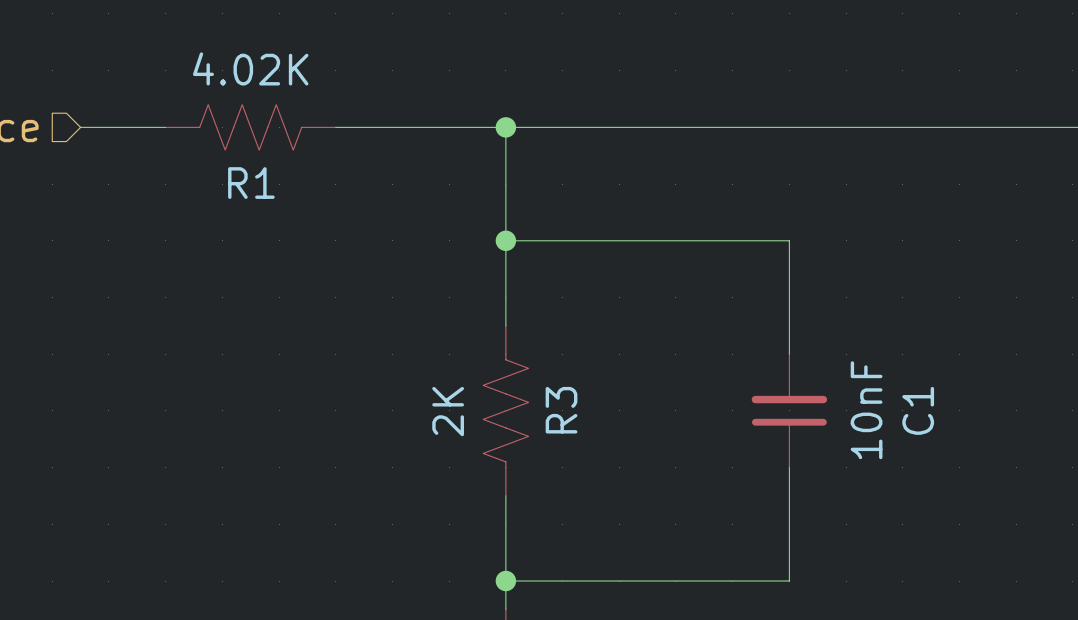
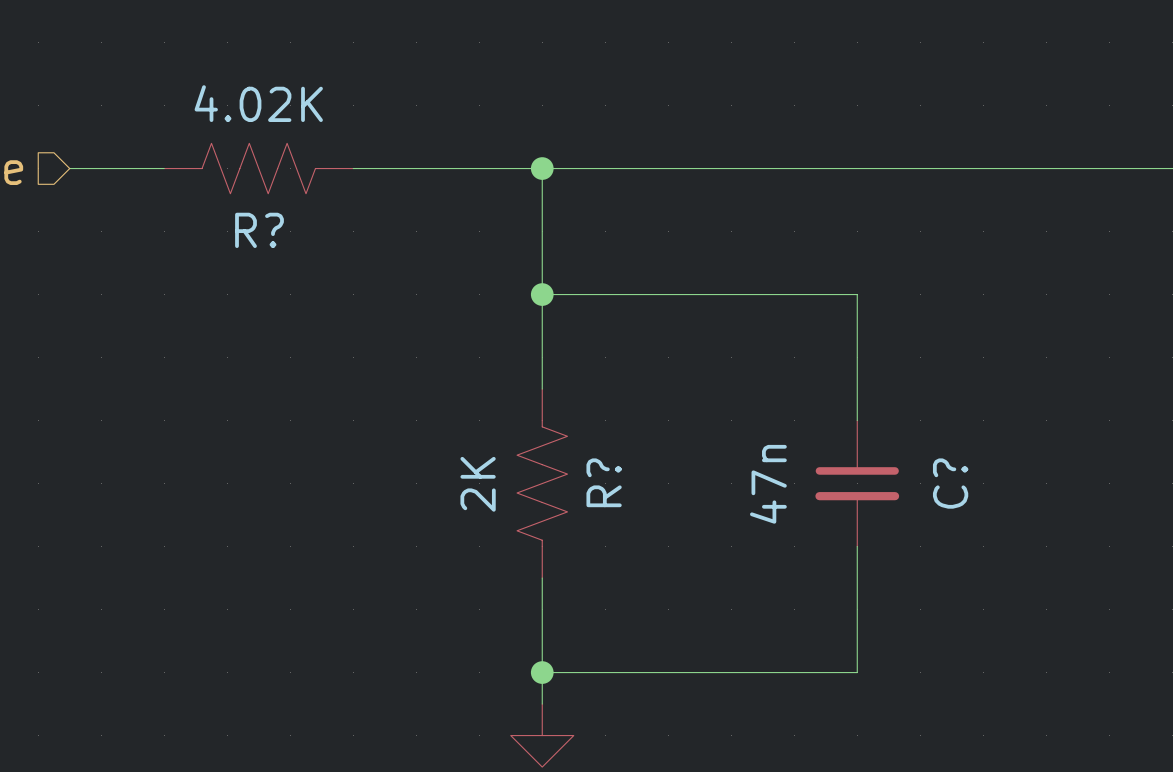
R1 name: R1 (251, 183) -> R? (259, 230)
R3 name: R3 (561, 410) -> R? (604, 482)
C1: 10nF (789, 410) -> none
C?: none -> 47n (857, 483)

